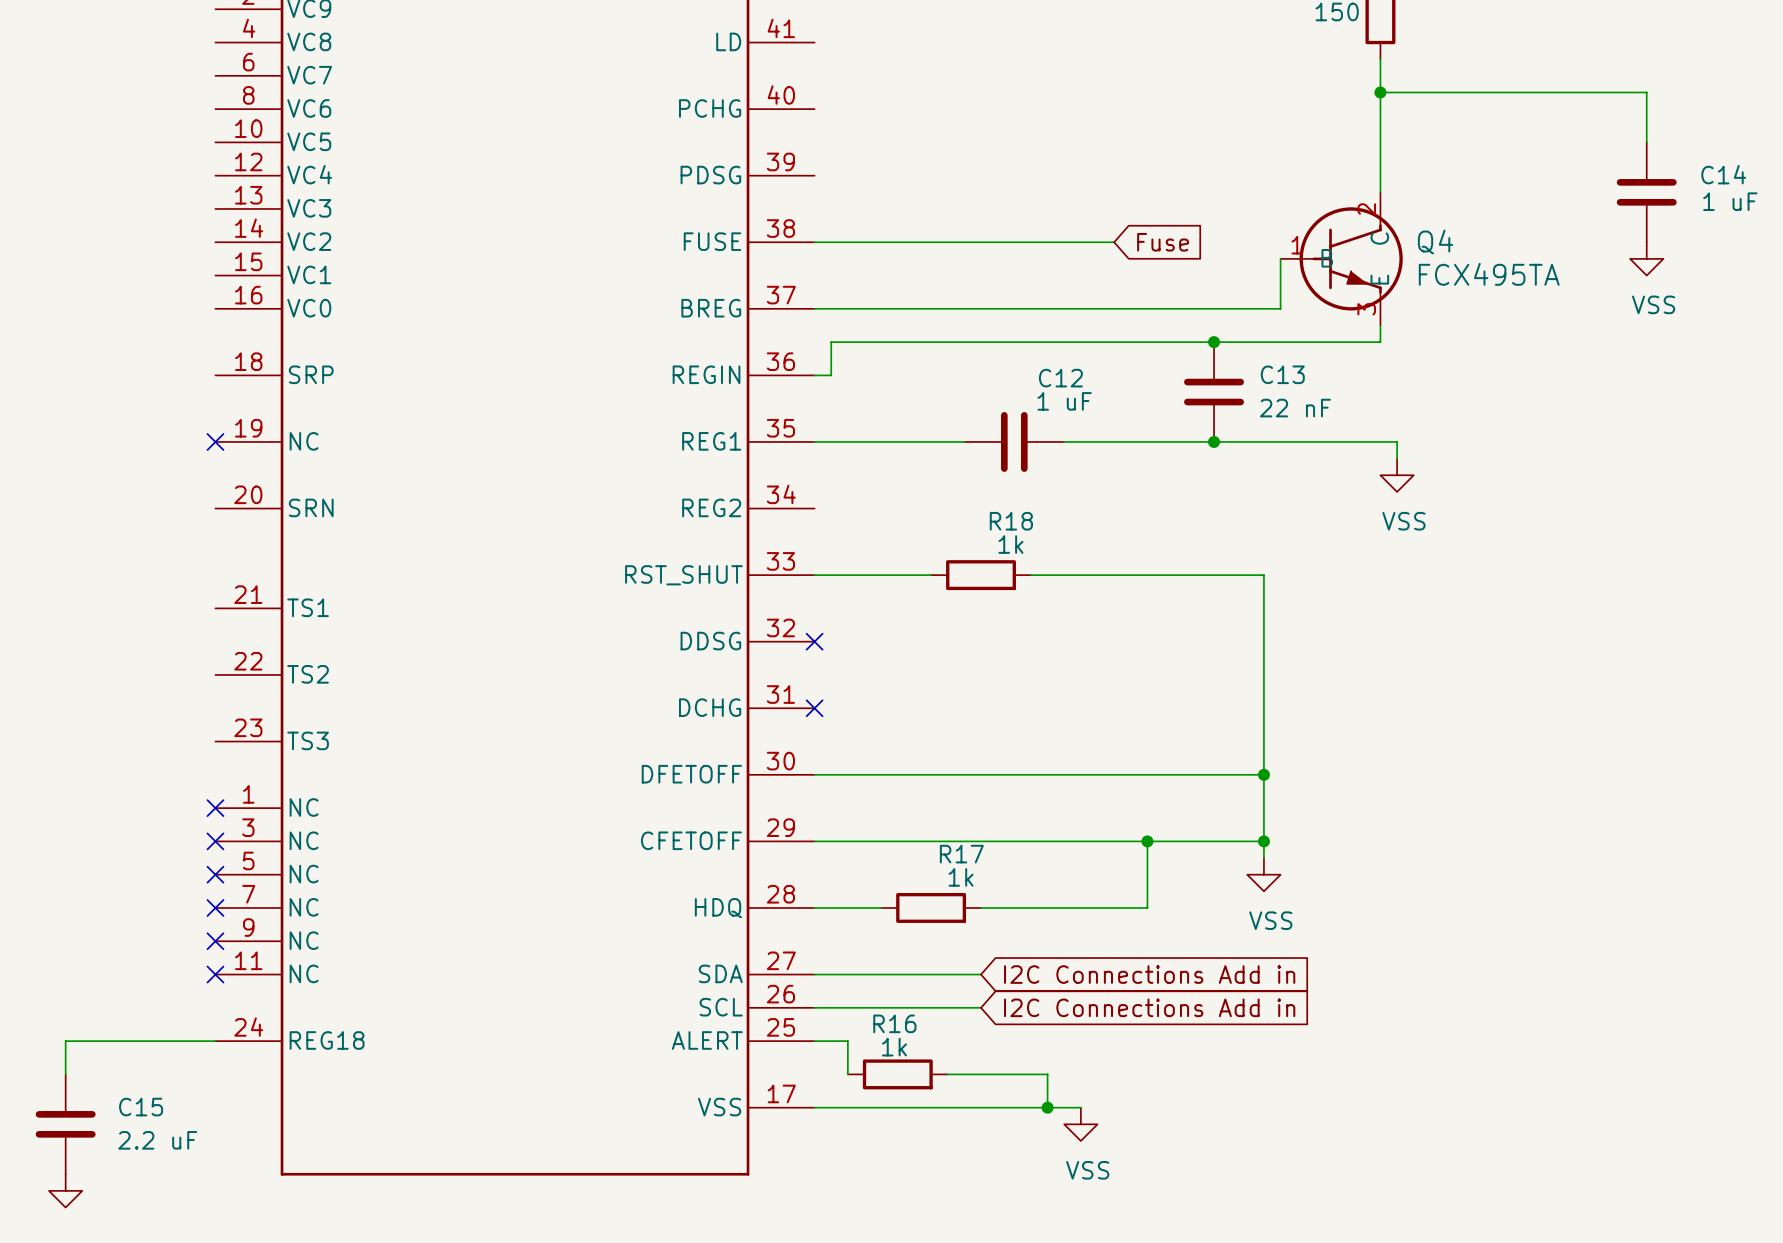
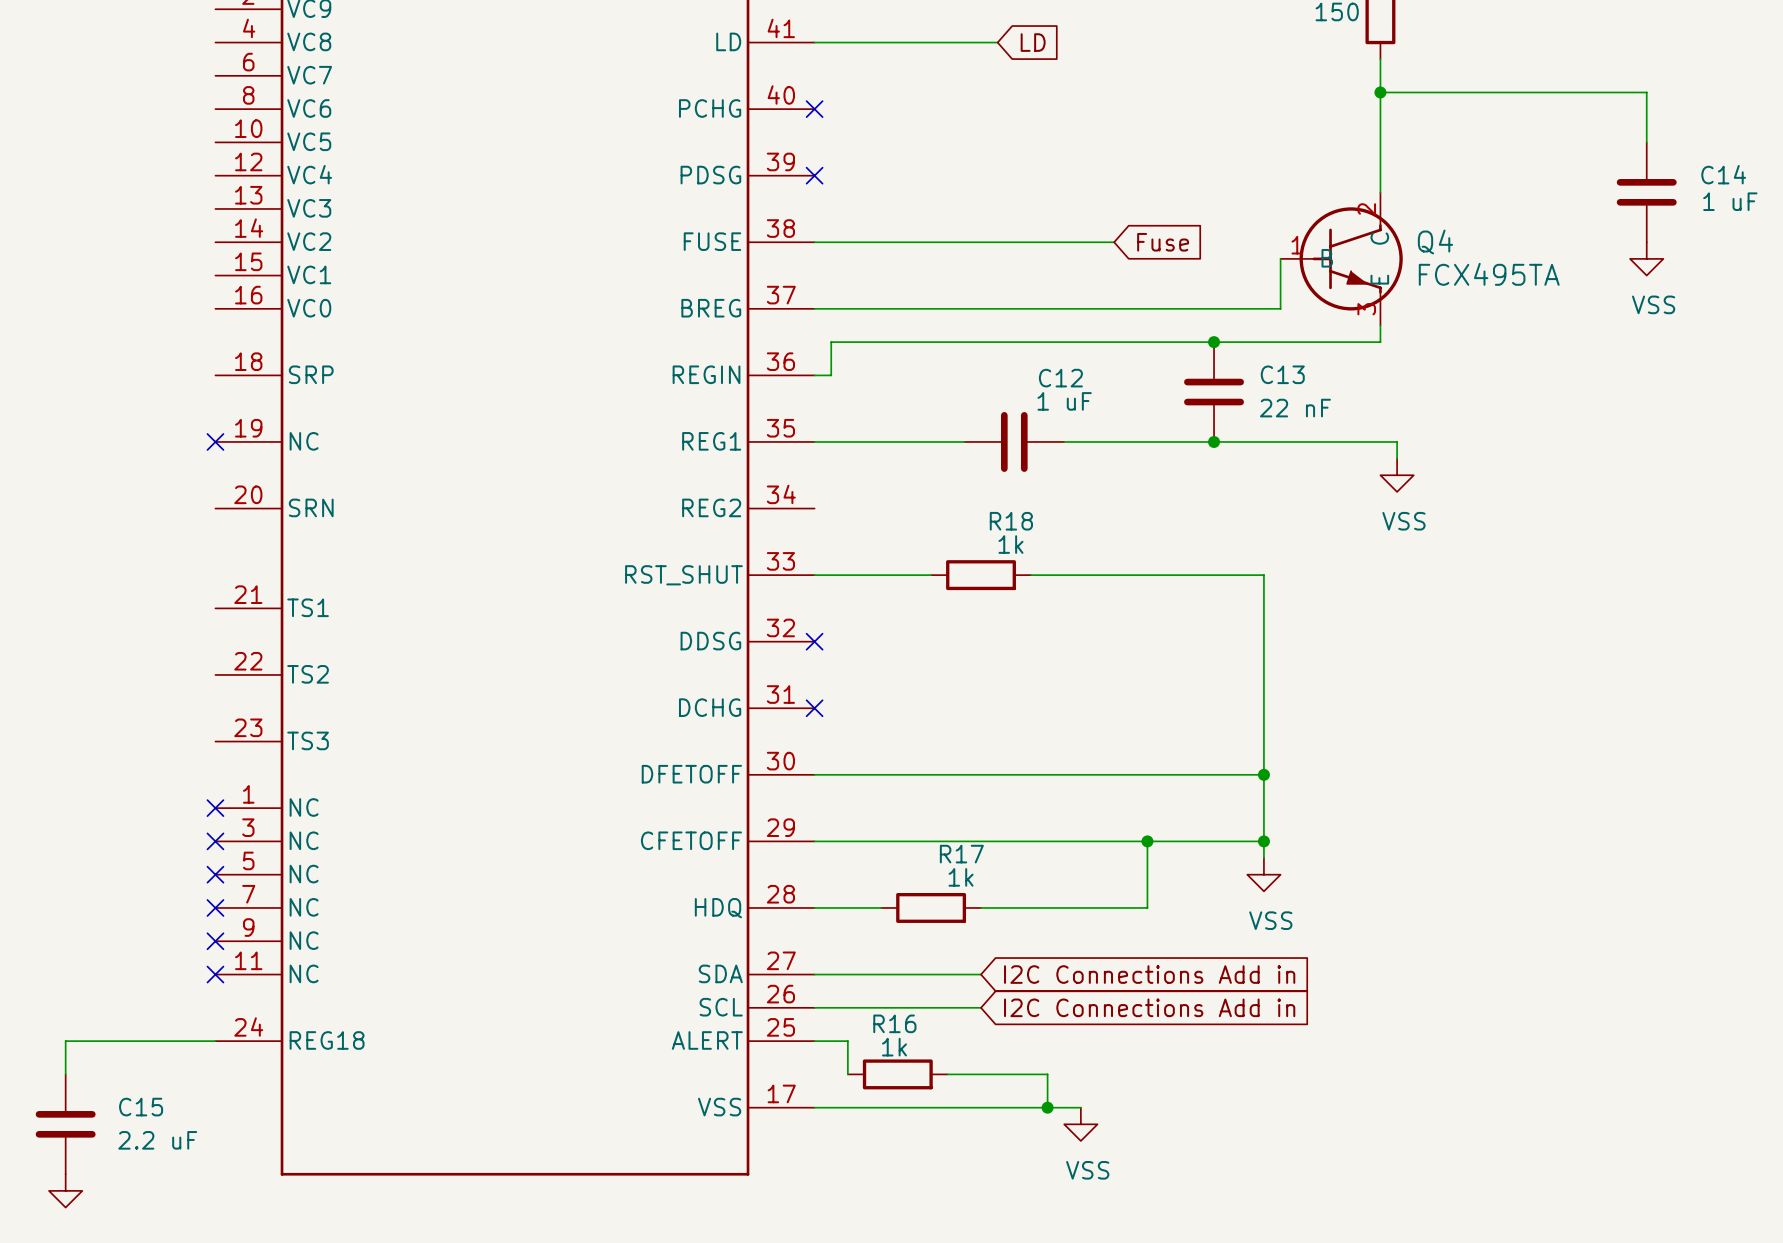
wire: none -> (814, 42) (997, 42)
global label: none -> LD (1033, 42)
no-connect mark: none -> (814, 109)
no-connect mark: none -> (814, 175)

